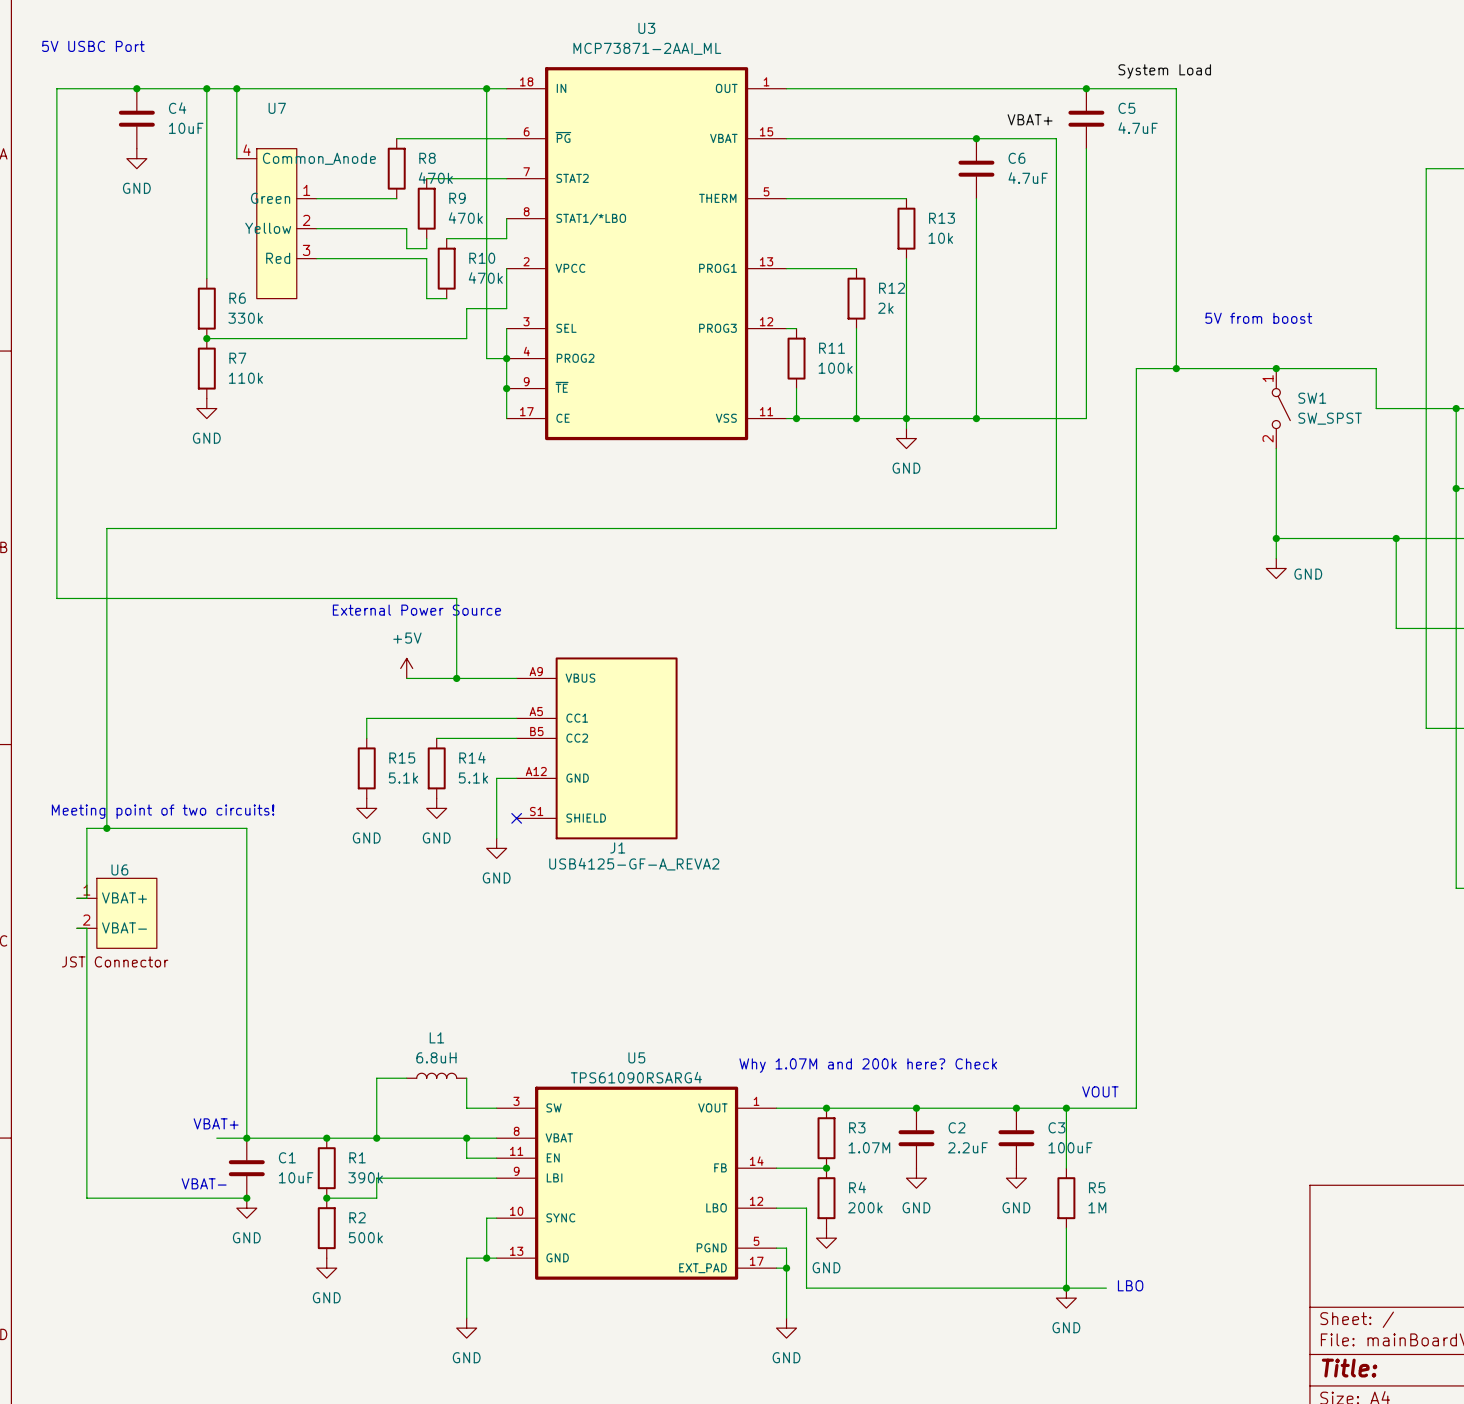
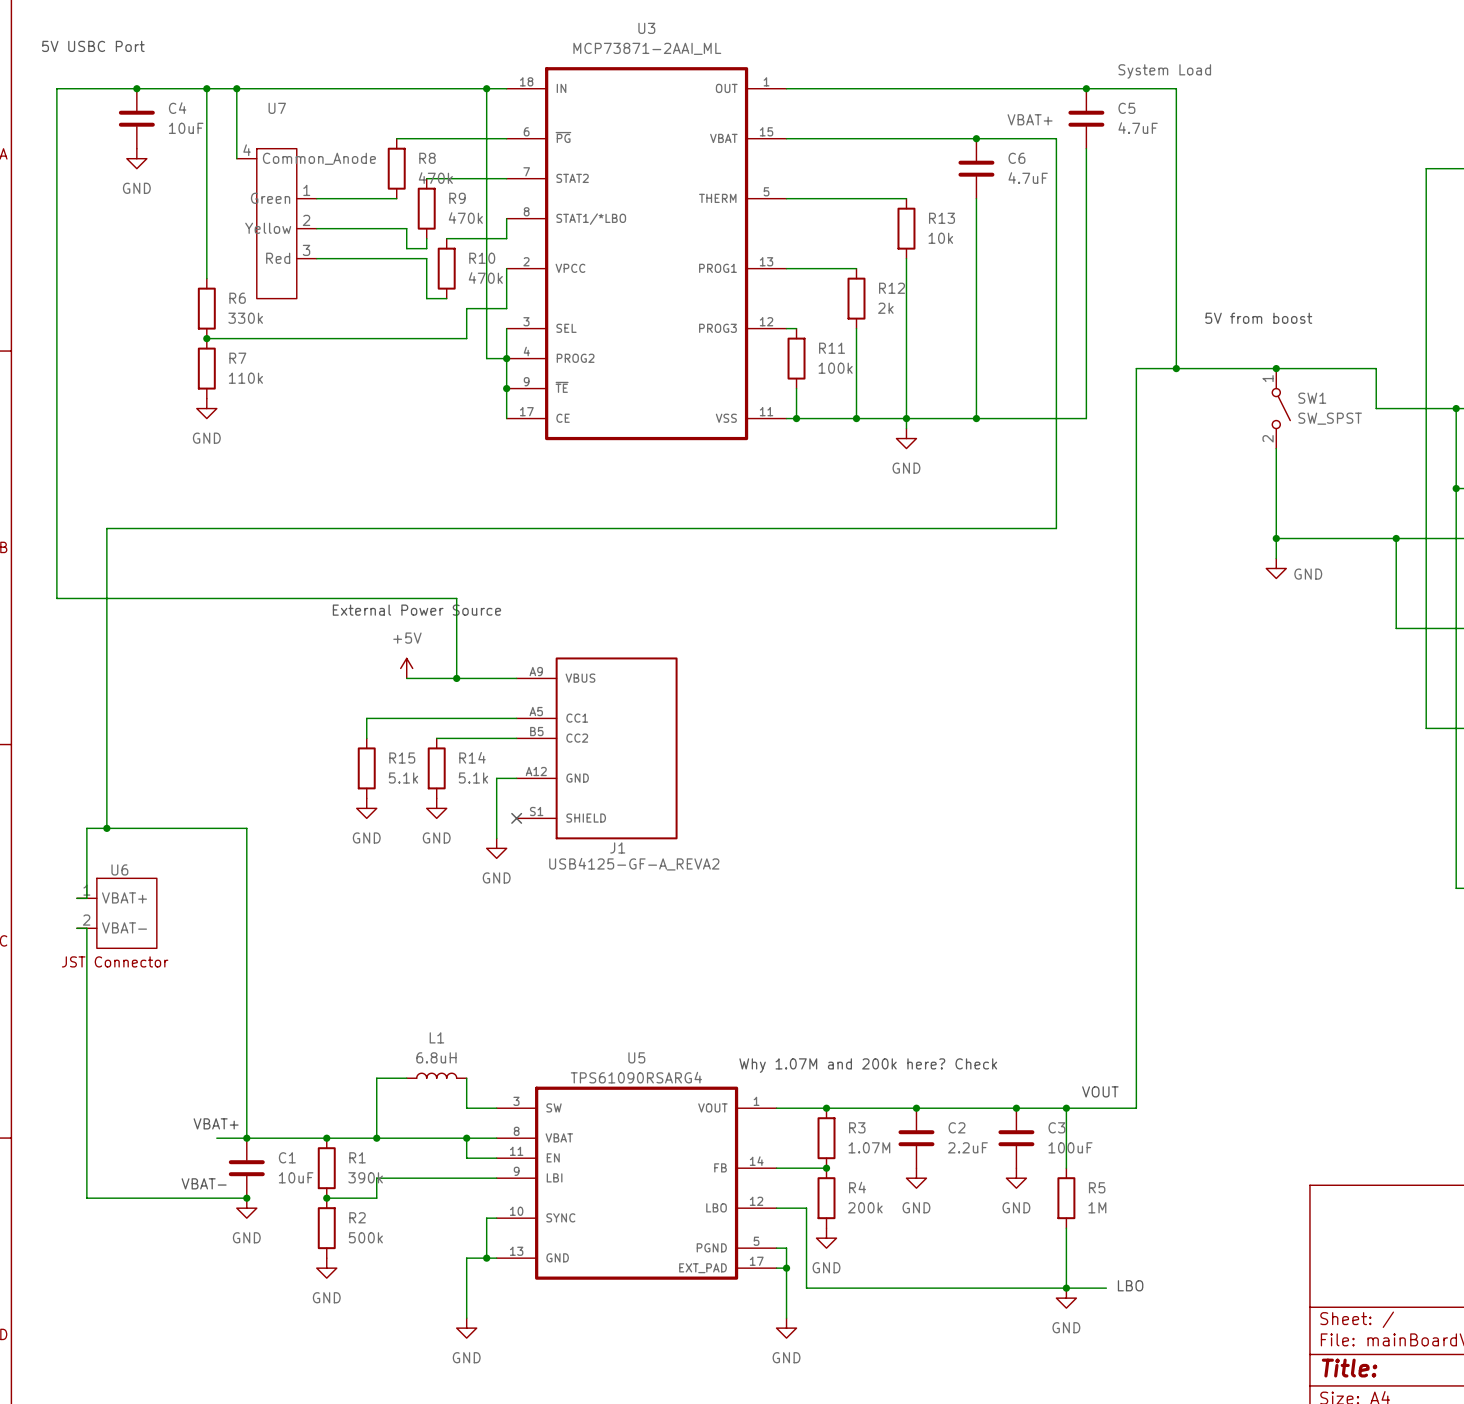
text: Meeting point of two circuits! (163, 811) -> none

